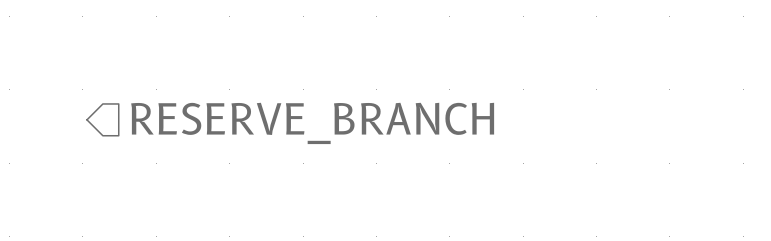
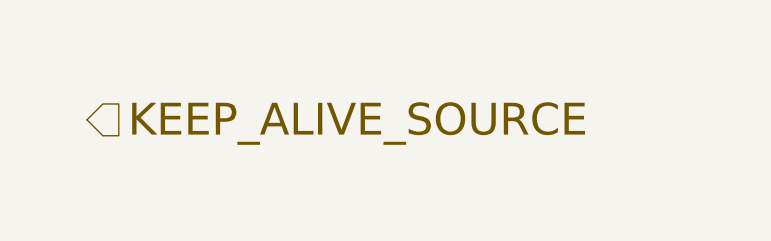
hierarchical label: RESERVE_BRANCH (312, 123) -> KEEP_ALIVE_SOURCE (358, 123)

